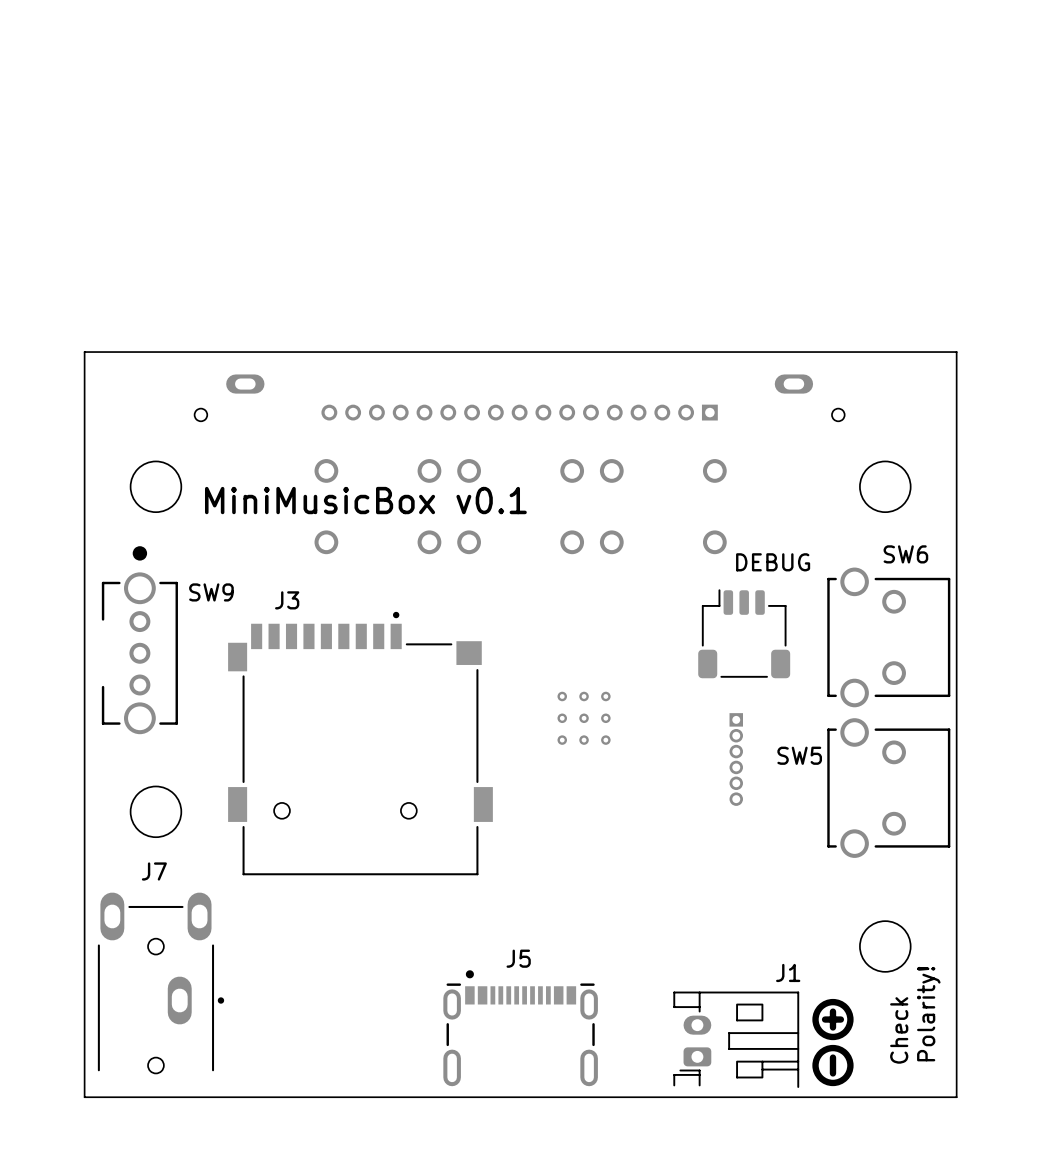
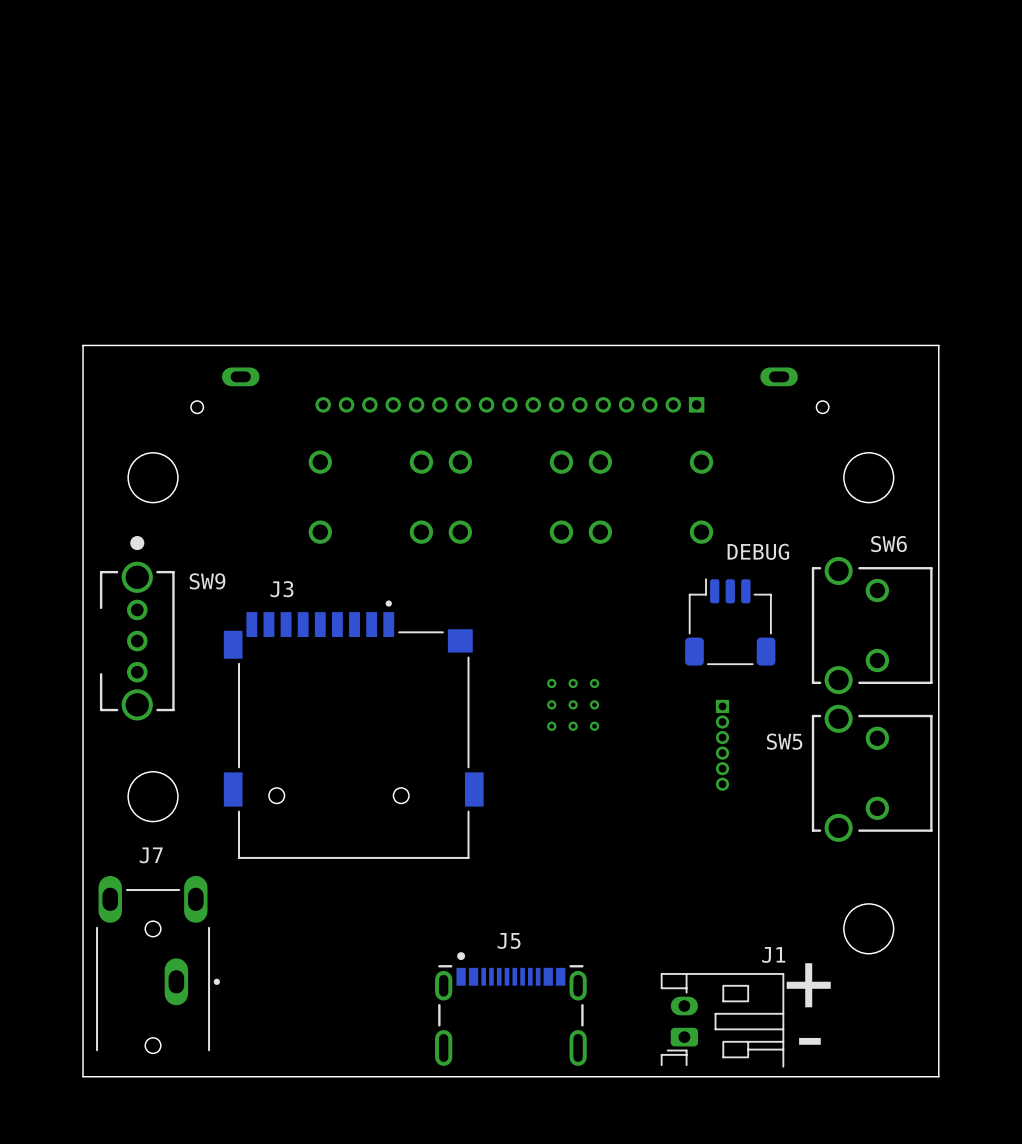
text: MiniMusicBox v0.1 (365, 500) -> none
drawing: [812, 998, 854, 1087] -> none
text: none -> + (808, 985)
line: (832, 1011) (832, 1027) -> none
text: Polarity! (928, 1014) -> none
line: (840, 1019) (825, 1019) -> none
text: Check (899, 1030) -> none
line: (832, 1057) (832, 1073) -> none
text: none -> - (809, 1041)

